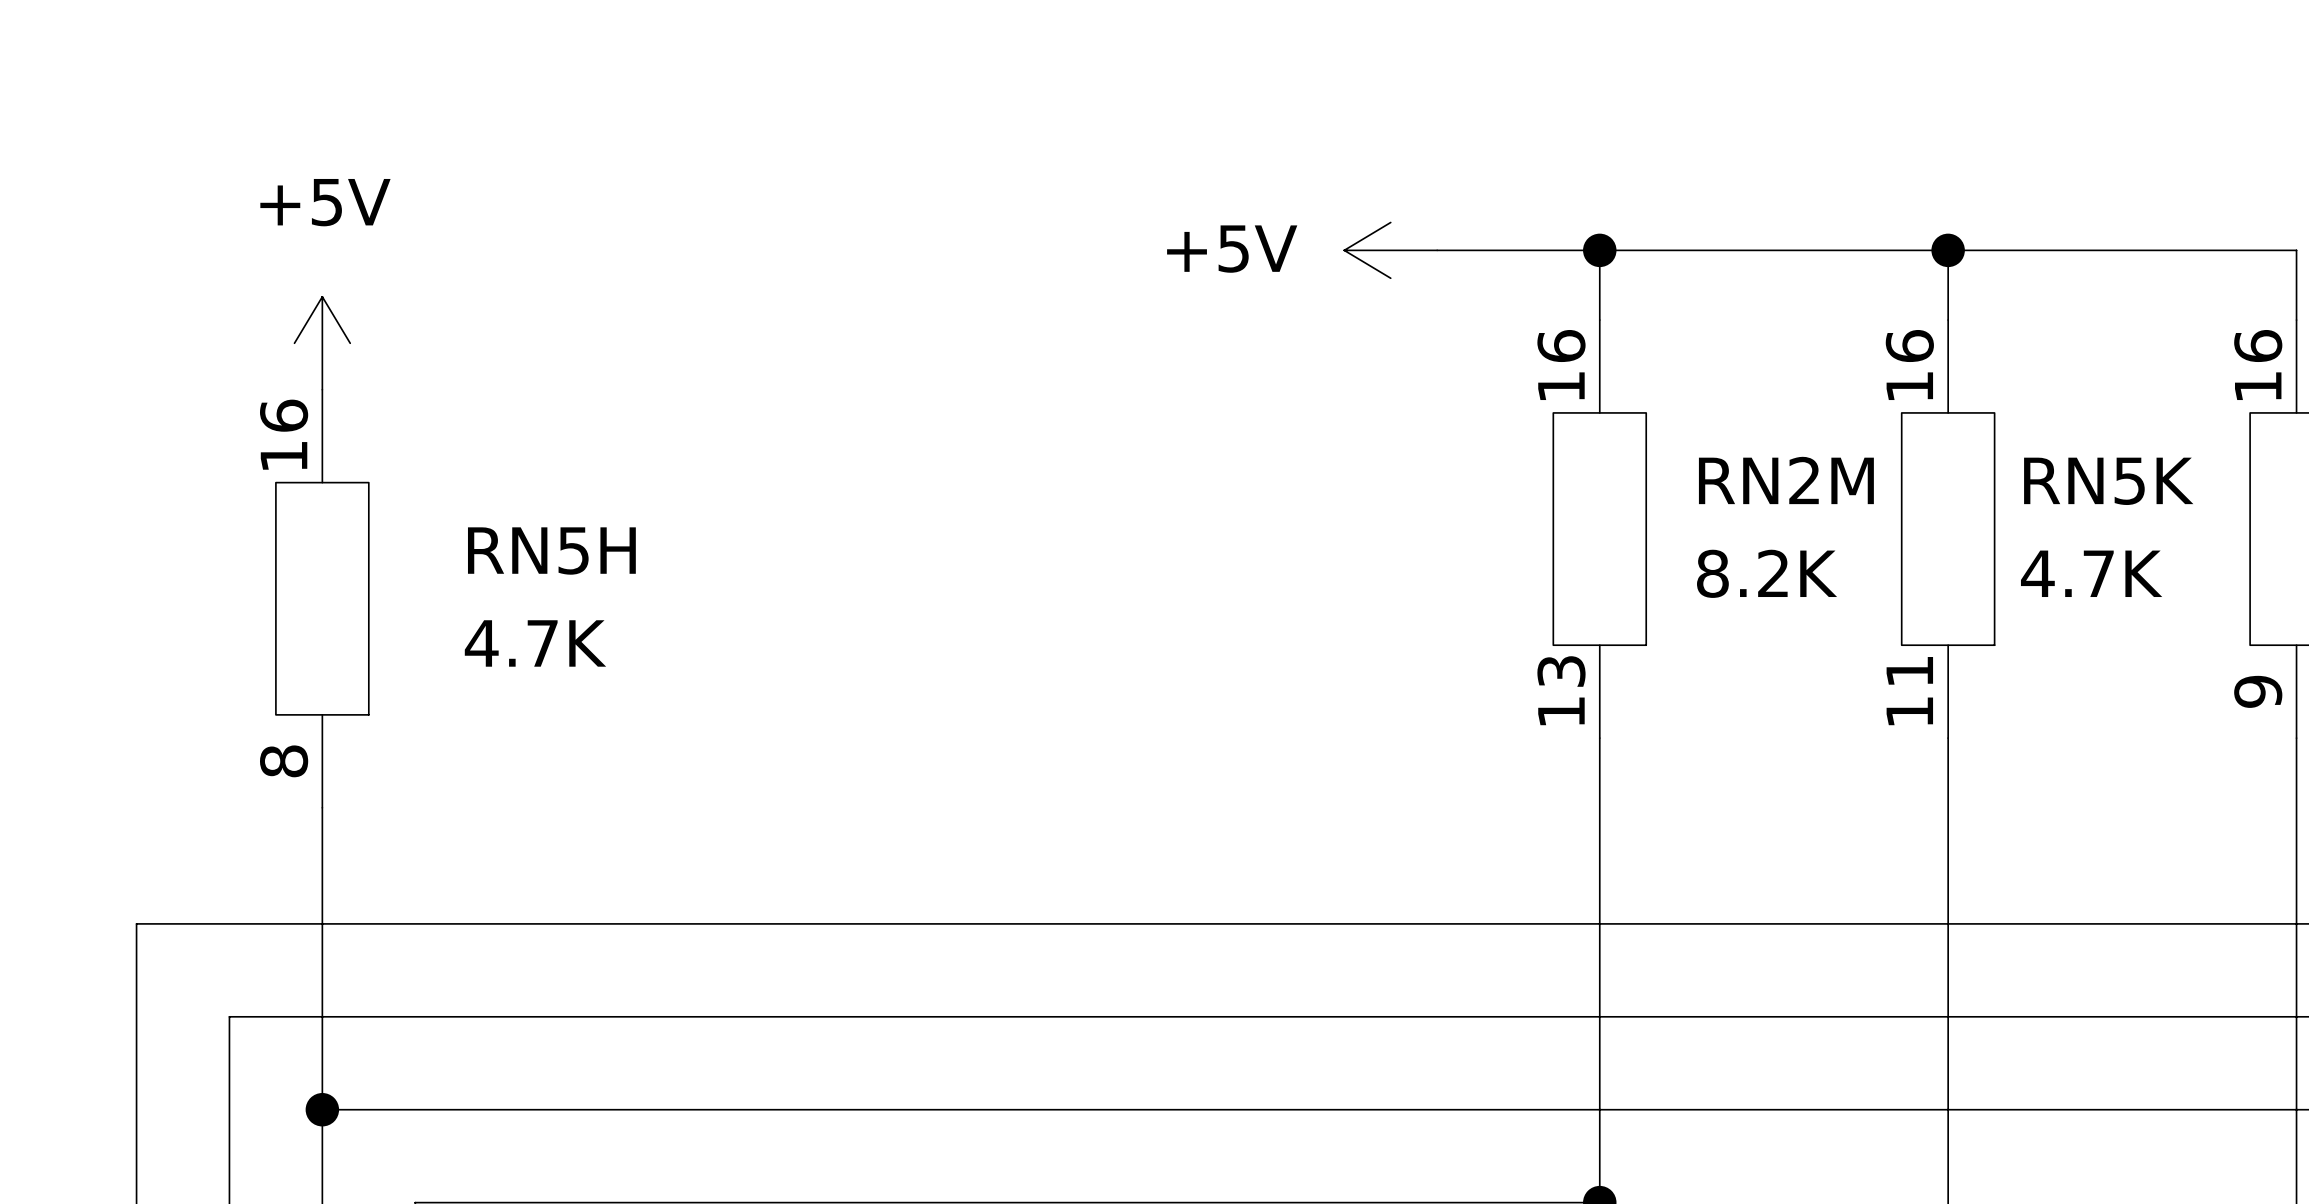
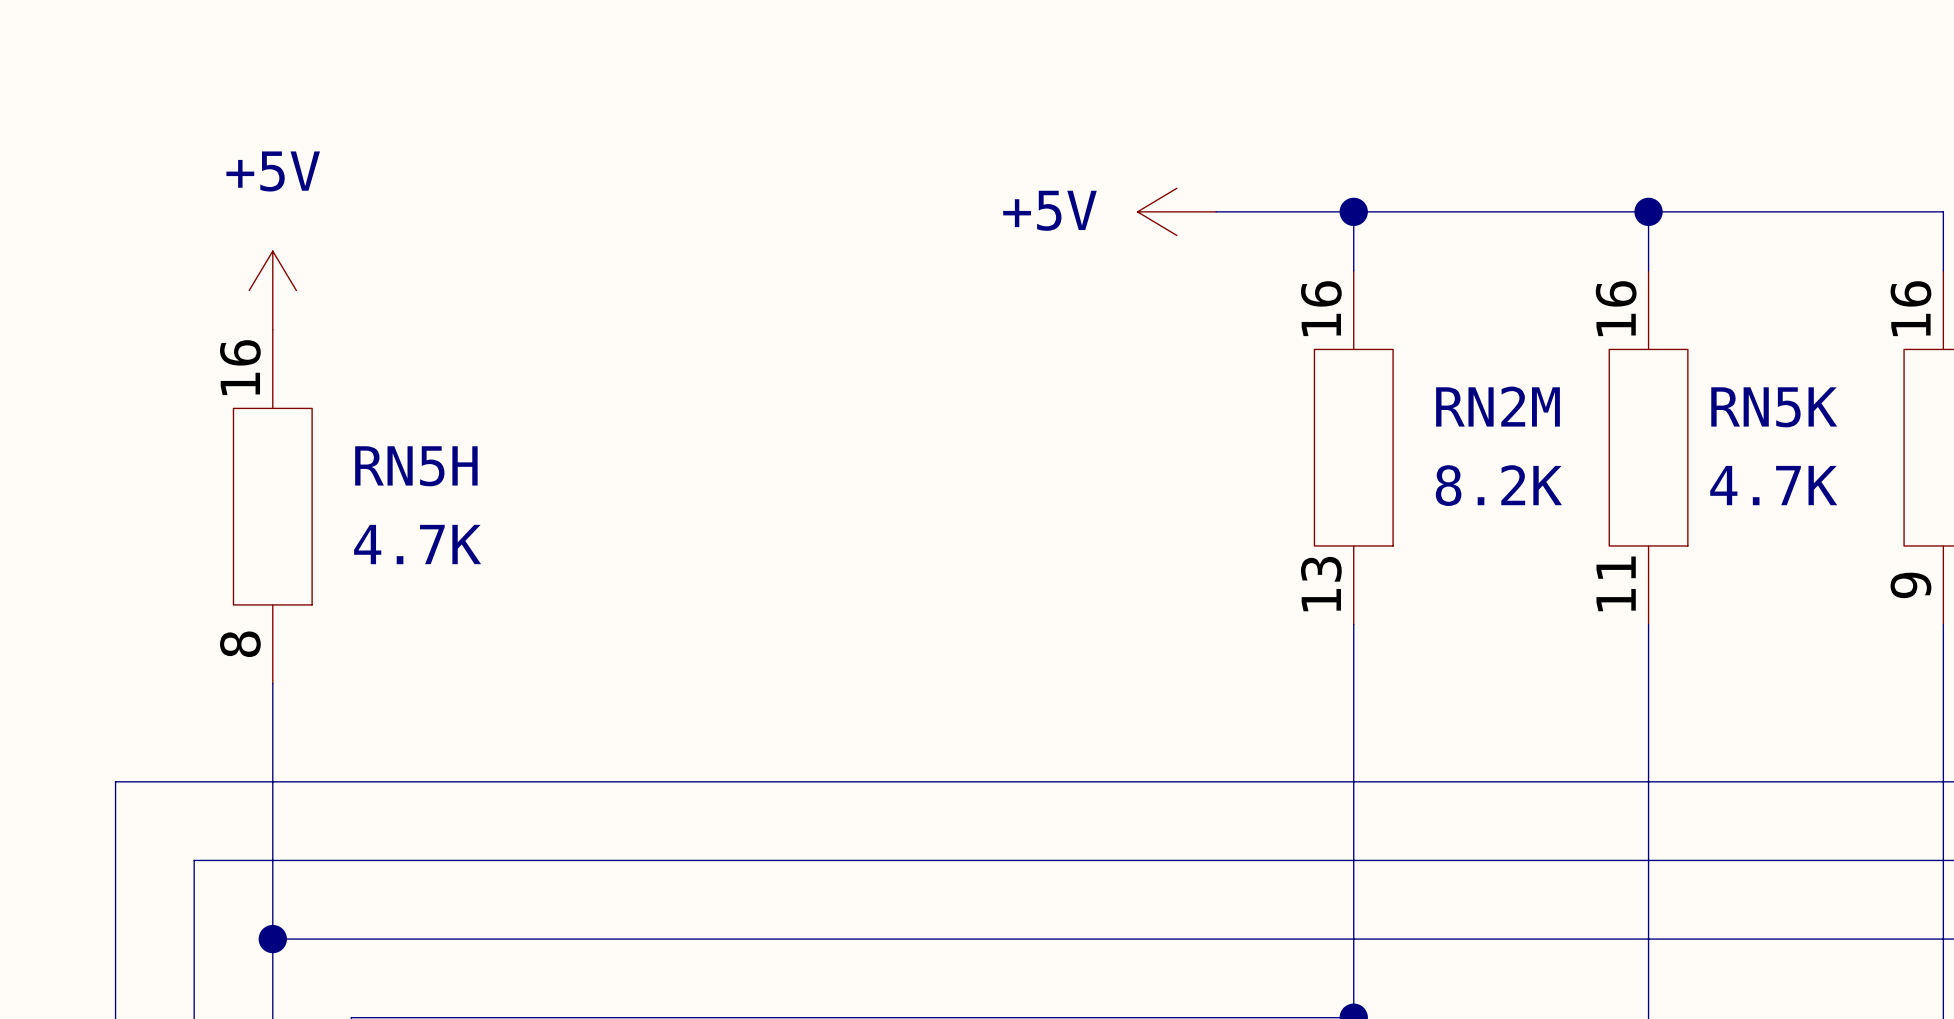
RN5H name position: RN5H (551, 551) -> RN5H (416, 466)
RN5H value position: 4.7K (535, 643) -> 4.7K (417, 544)

